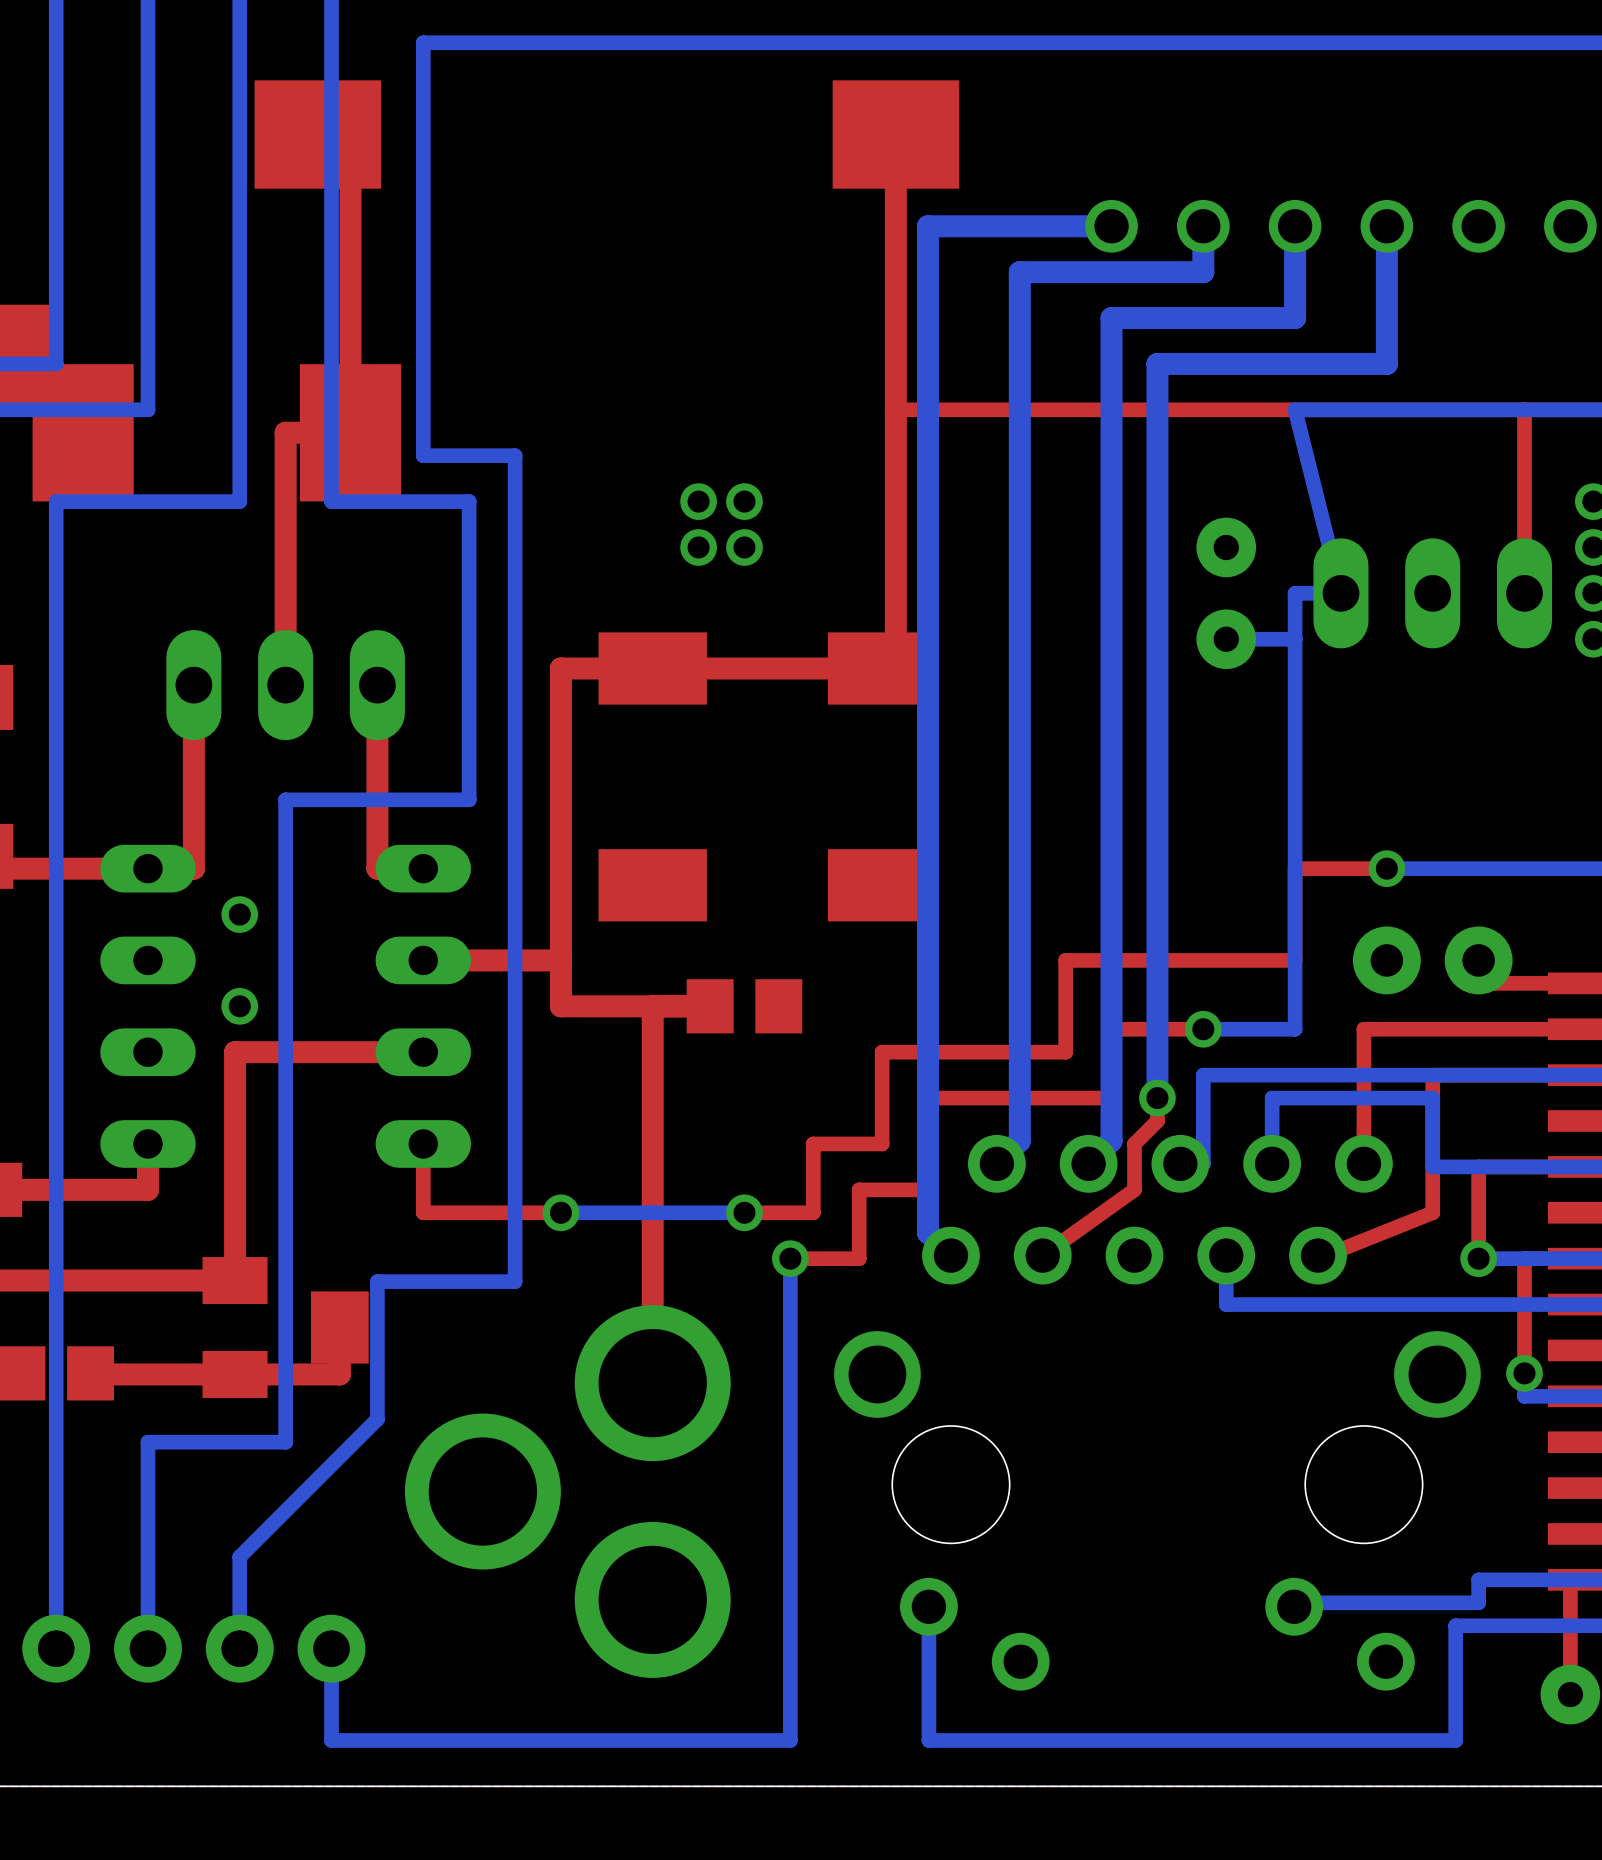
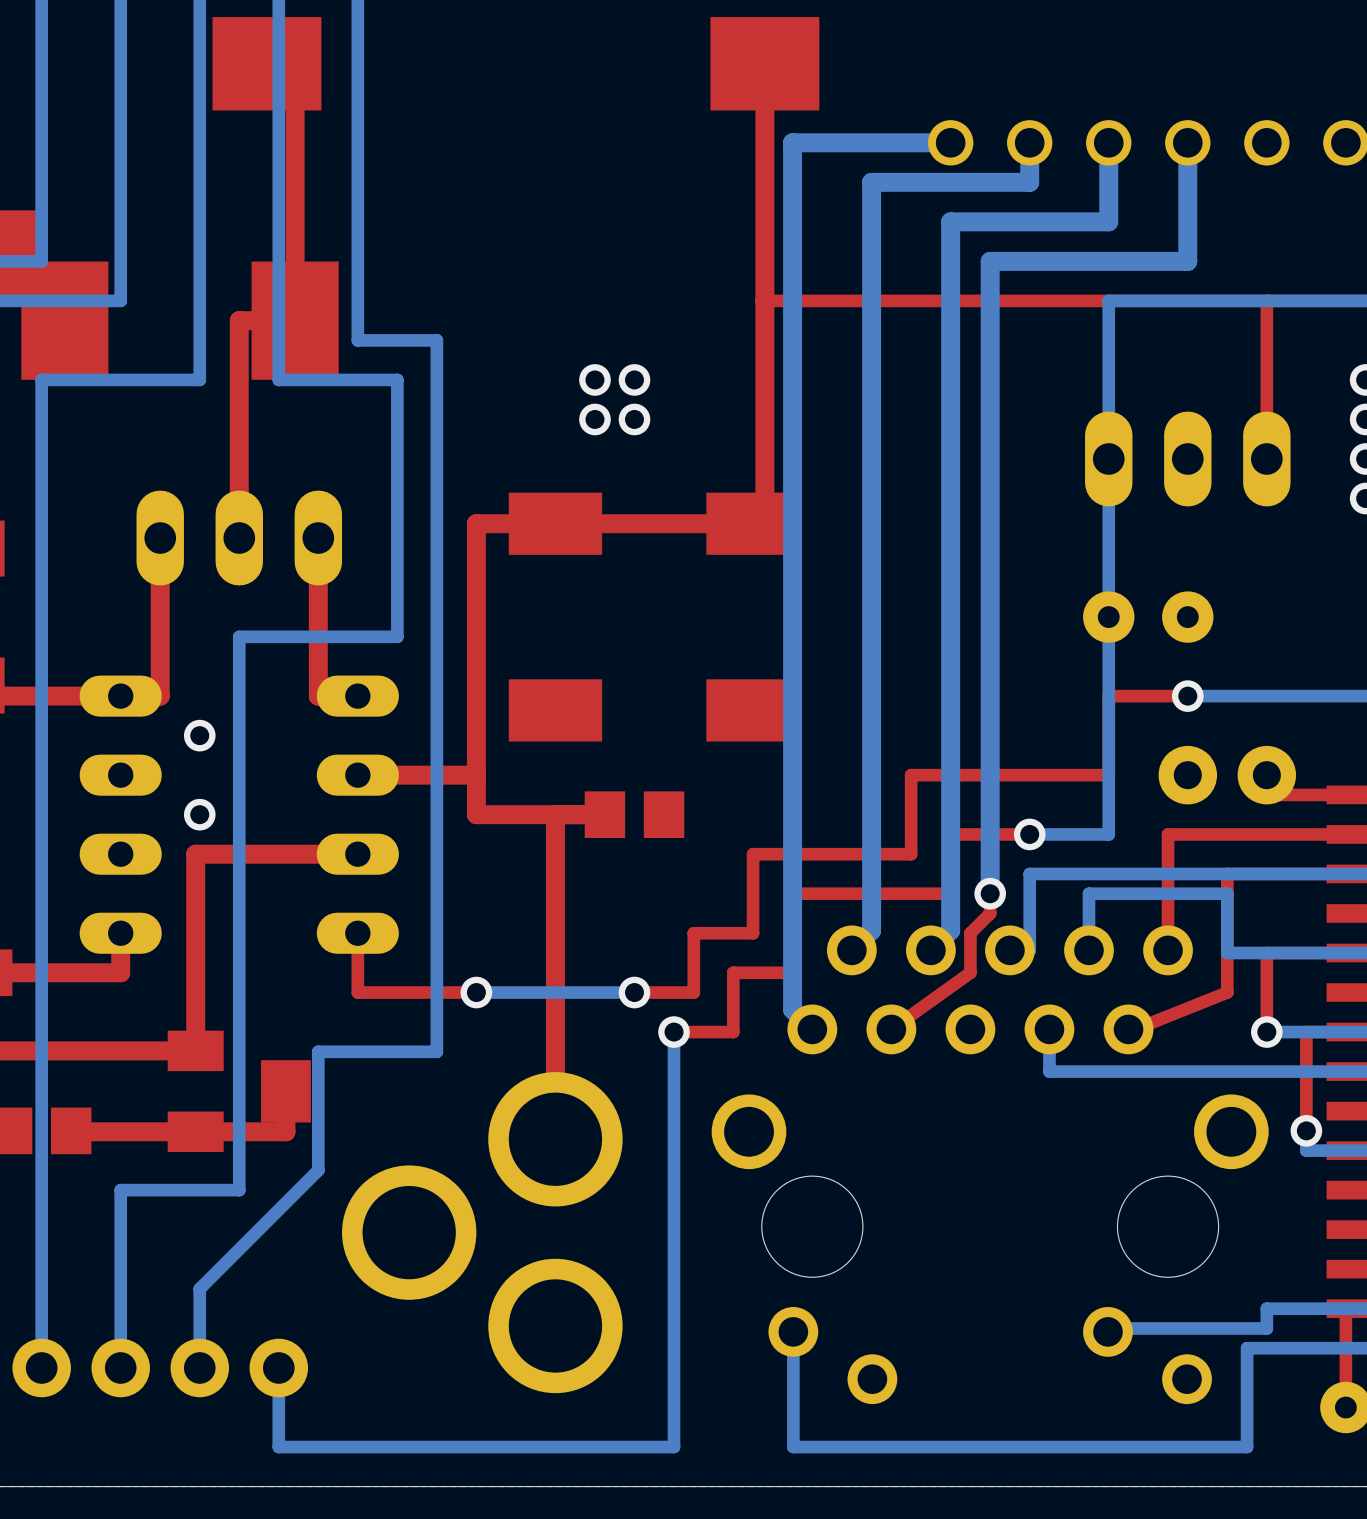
bottom track: (1295, 409) (1340, 593) (1295, 593) -> (1108, 300) (1108, 458)
top track: (1524, 409) (1524, 593) -> (1266, 300) (1266, 458)
part rotation: 0° (1226, 593) -> 90° clockwise (1148, 617)
part position: (1226, 593) -> (1148, 617)
part position: (1432, 593) -> (1187, 458)
bottom track: (1295, 639) (1226, 639) -> none

